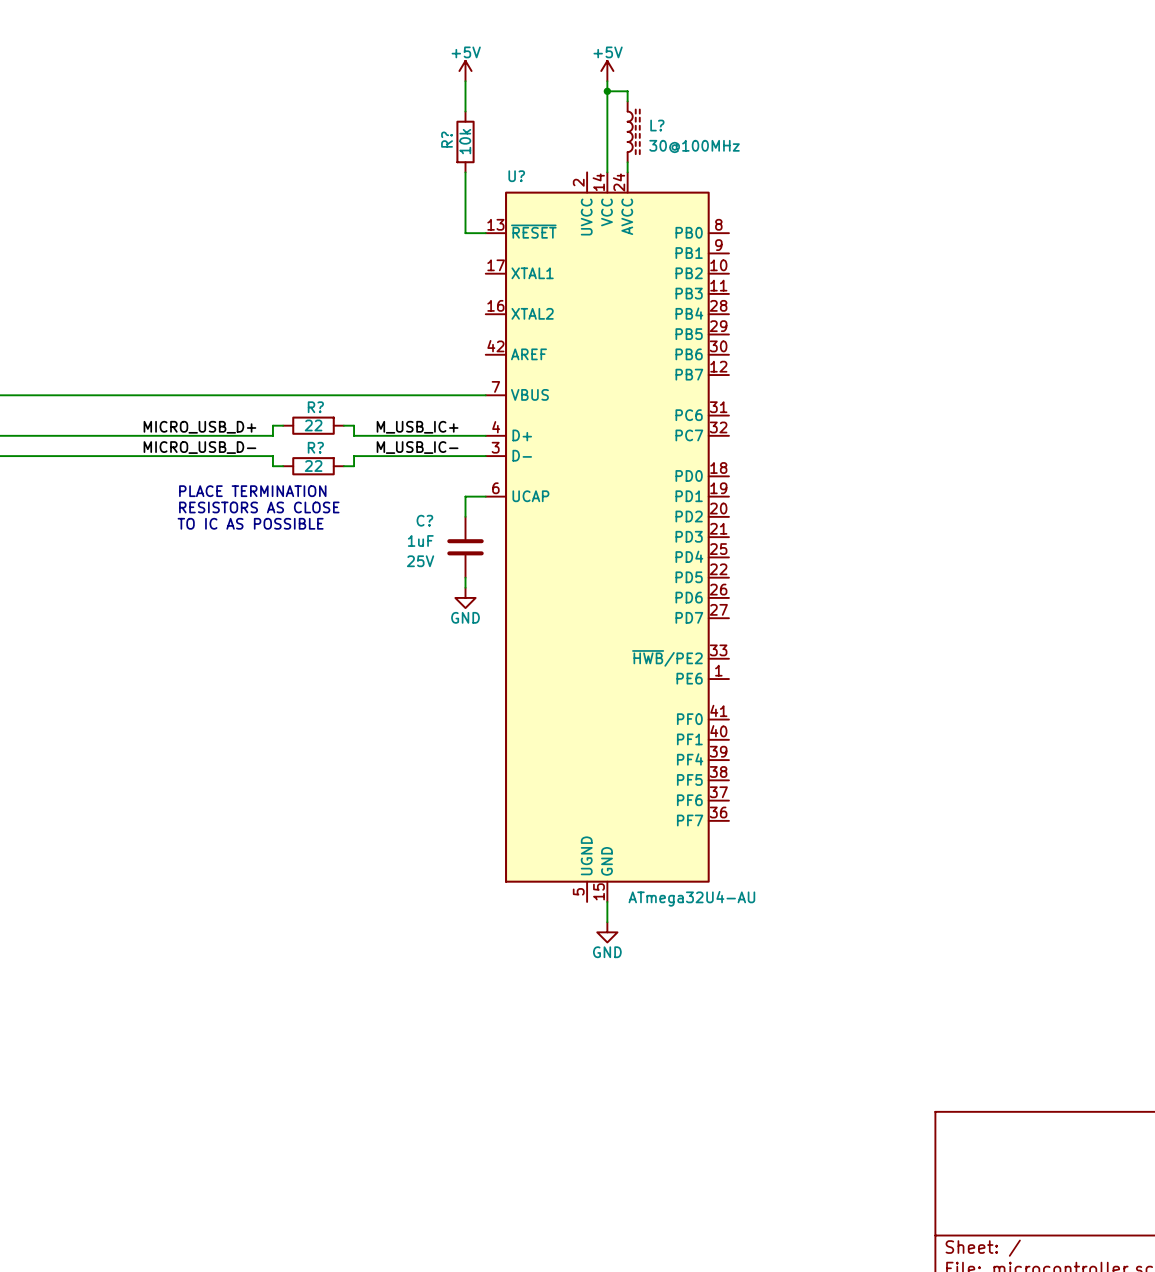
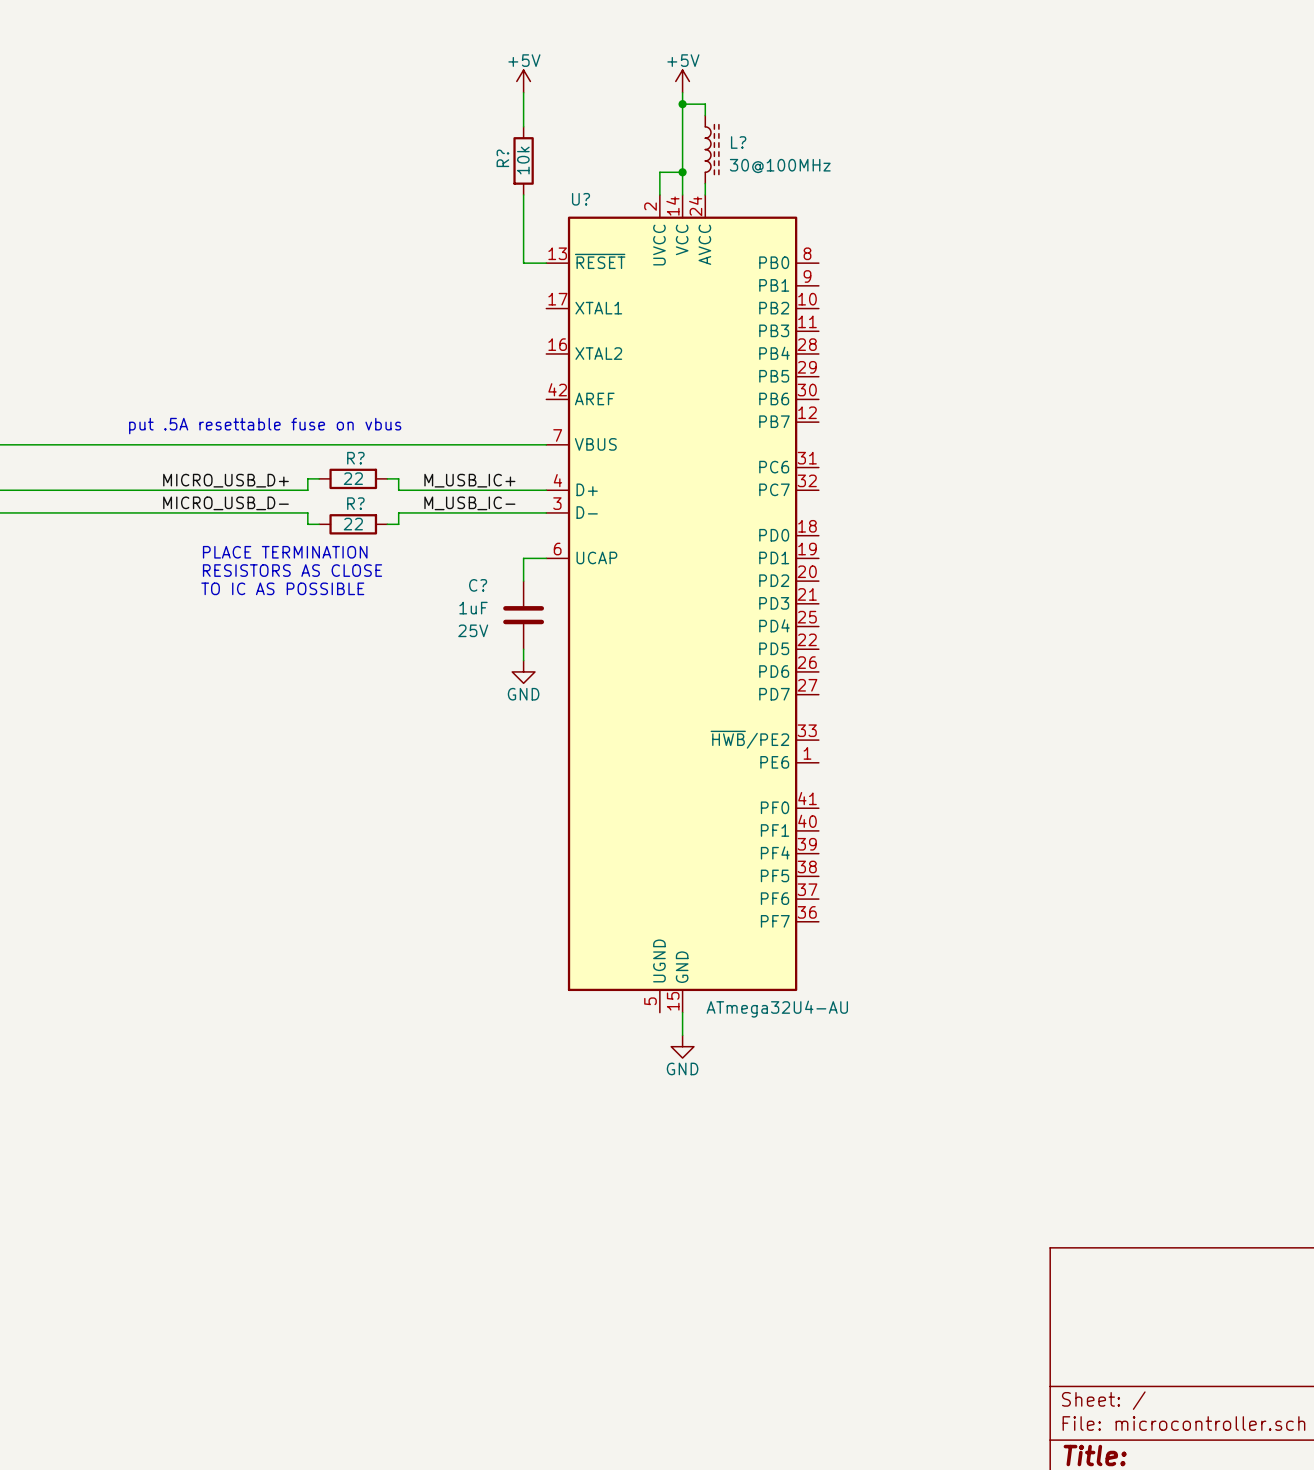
wire: none -> (682, 172) (659, 172) (659, 195)
junction: none -> (682, 172)
text: none -> put .5A resettable fuse on vbus (265, 426)

